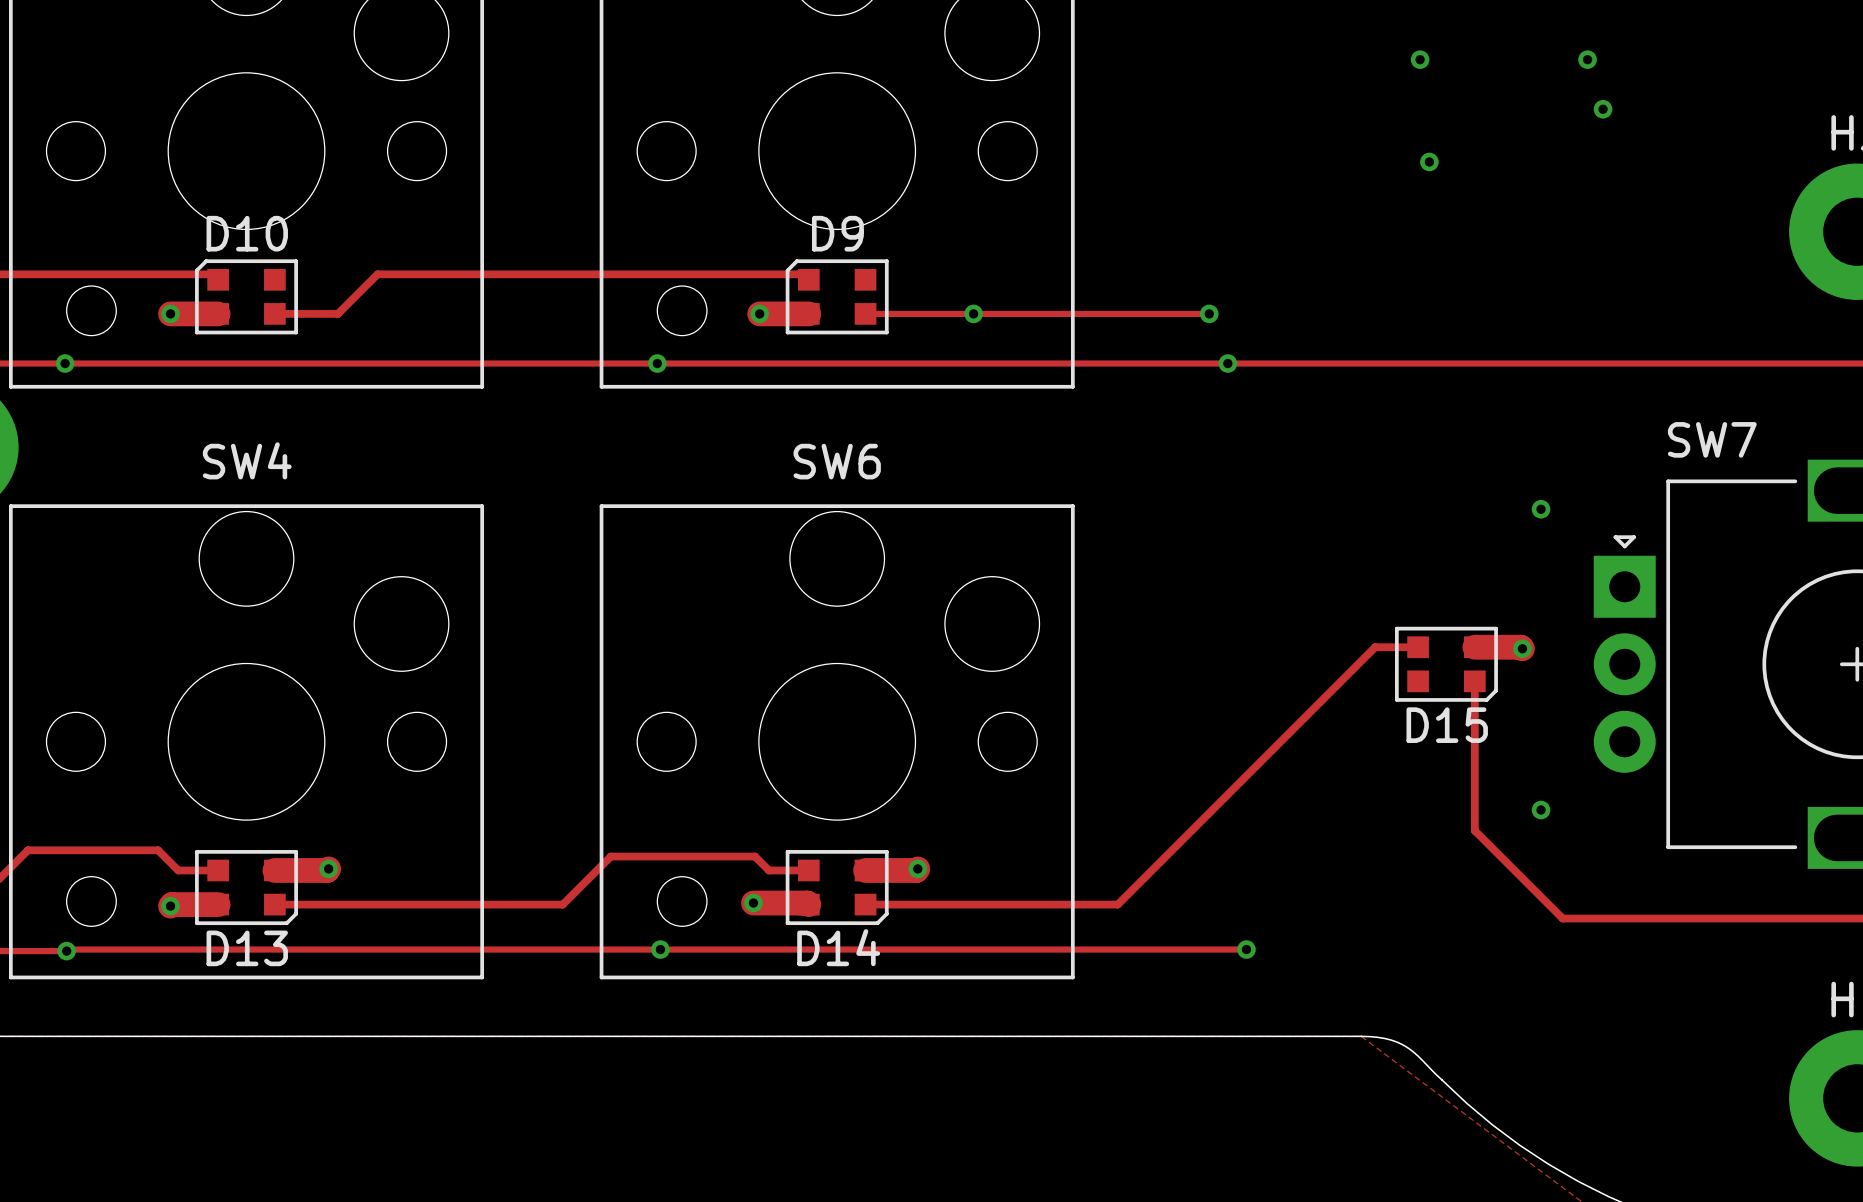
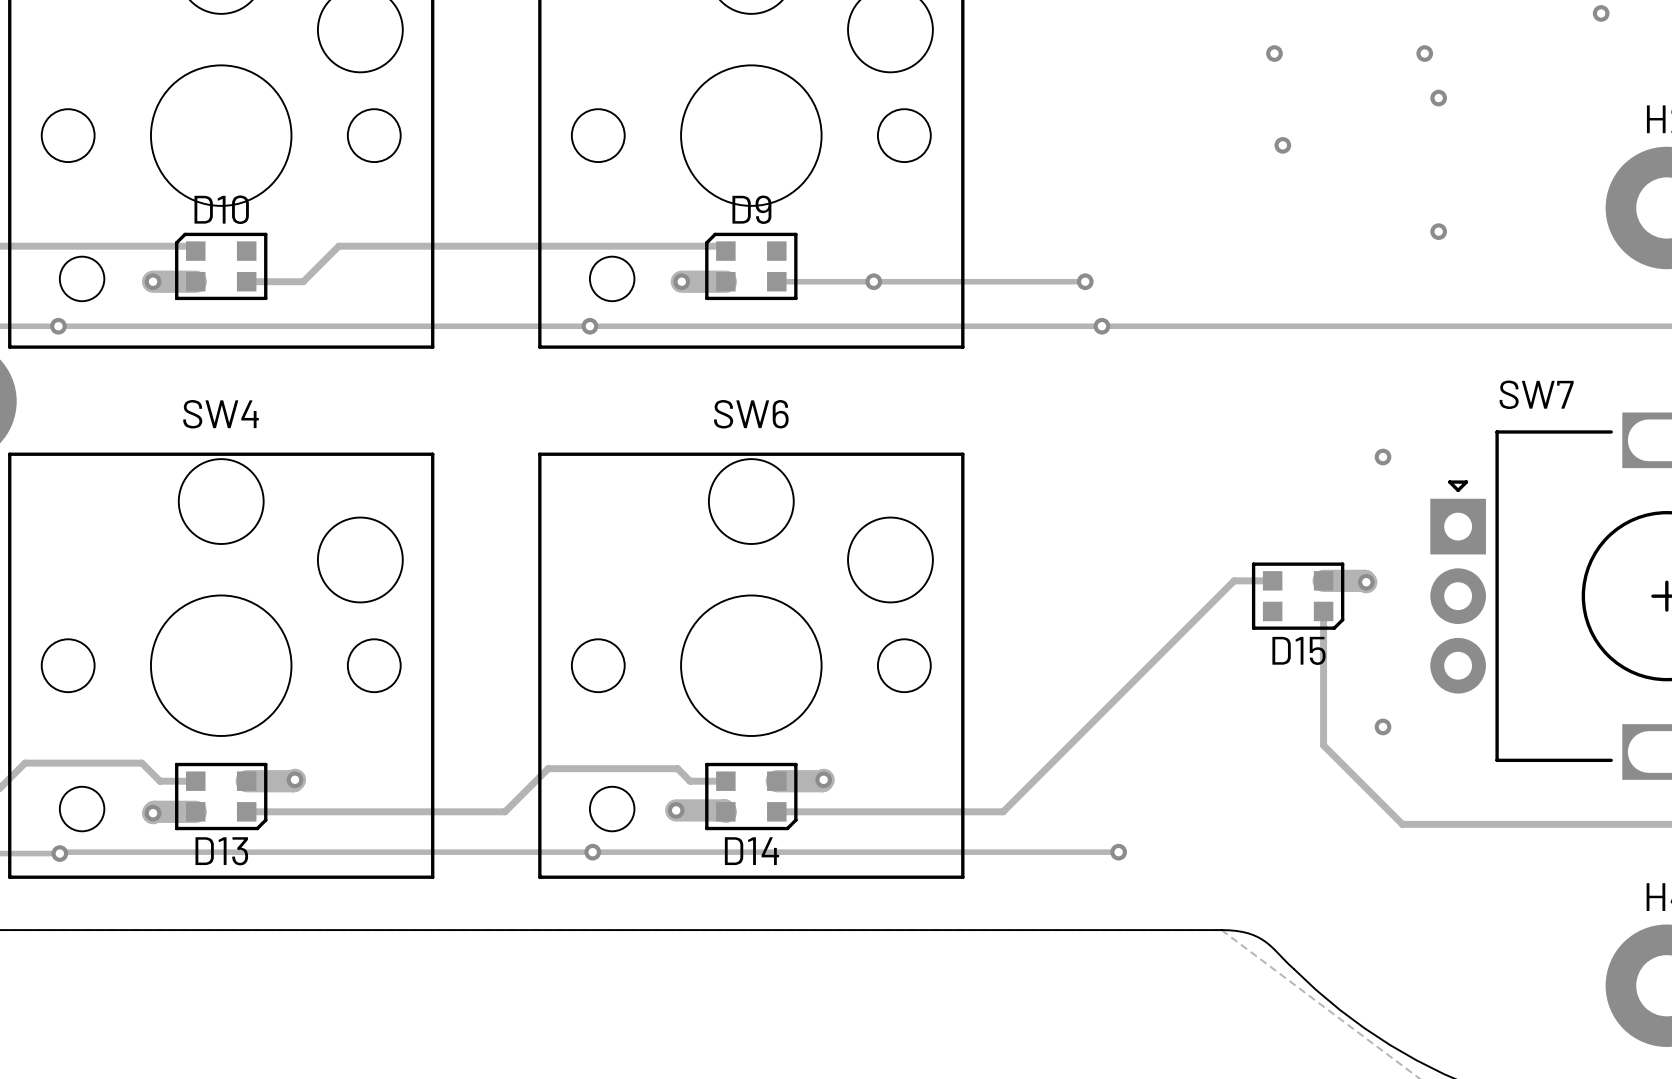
via: none -> (1601, 13)
via: none -> (1438, 231)

